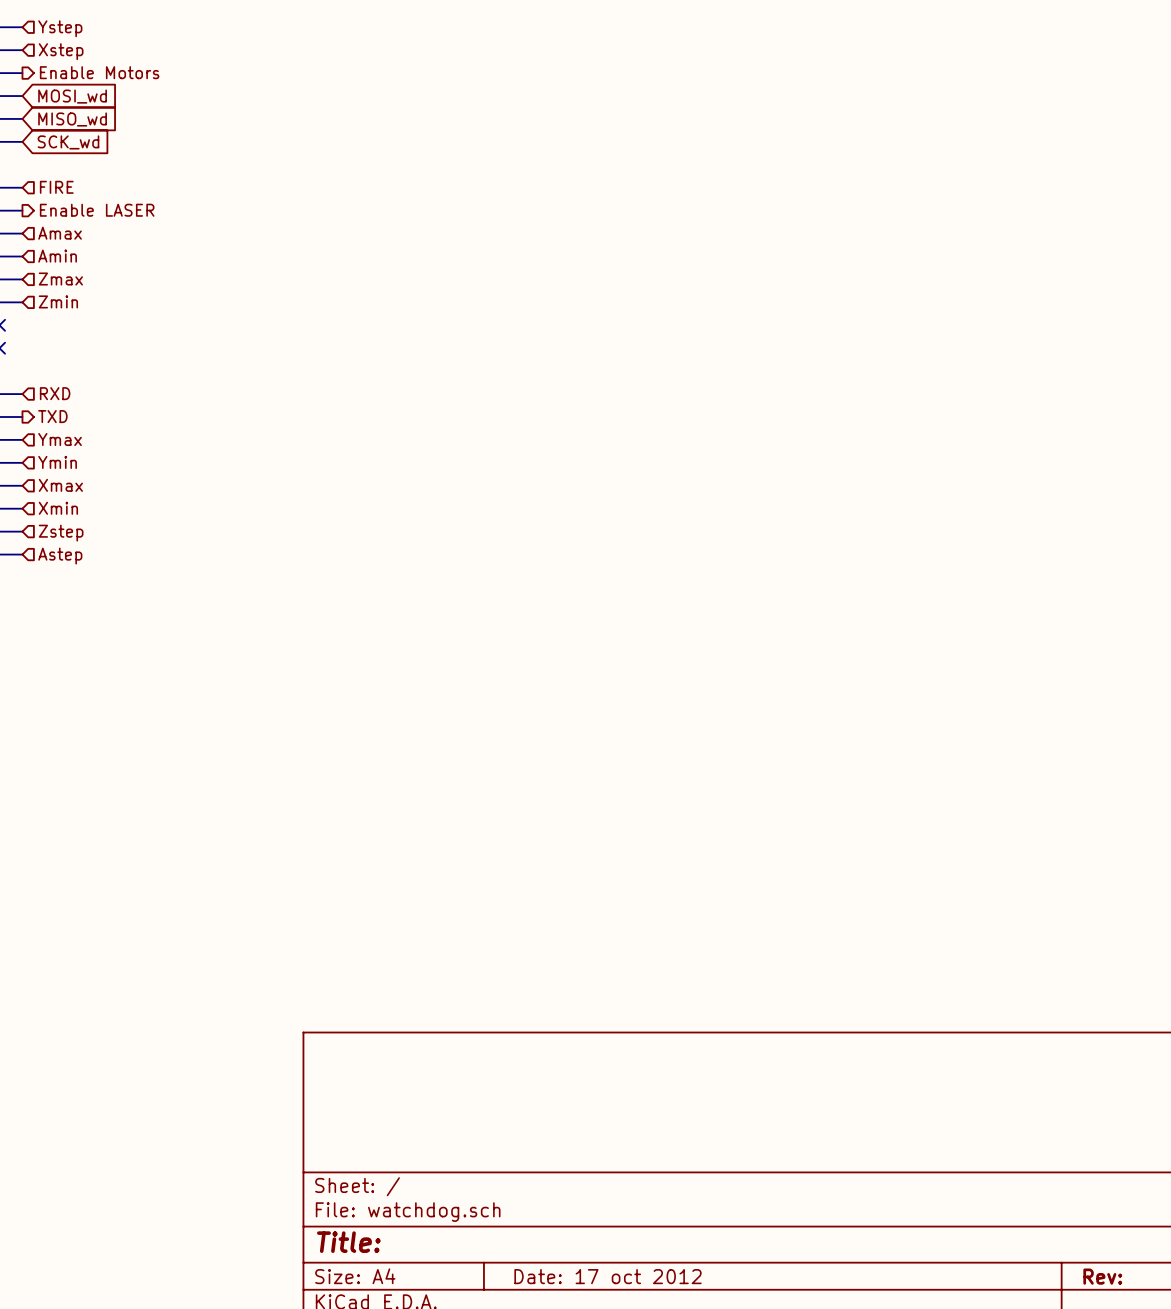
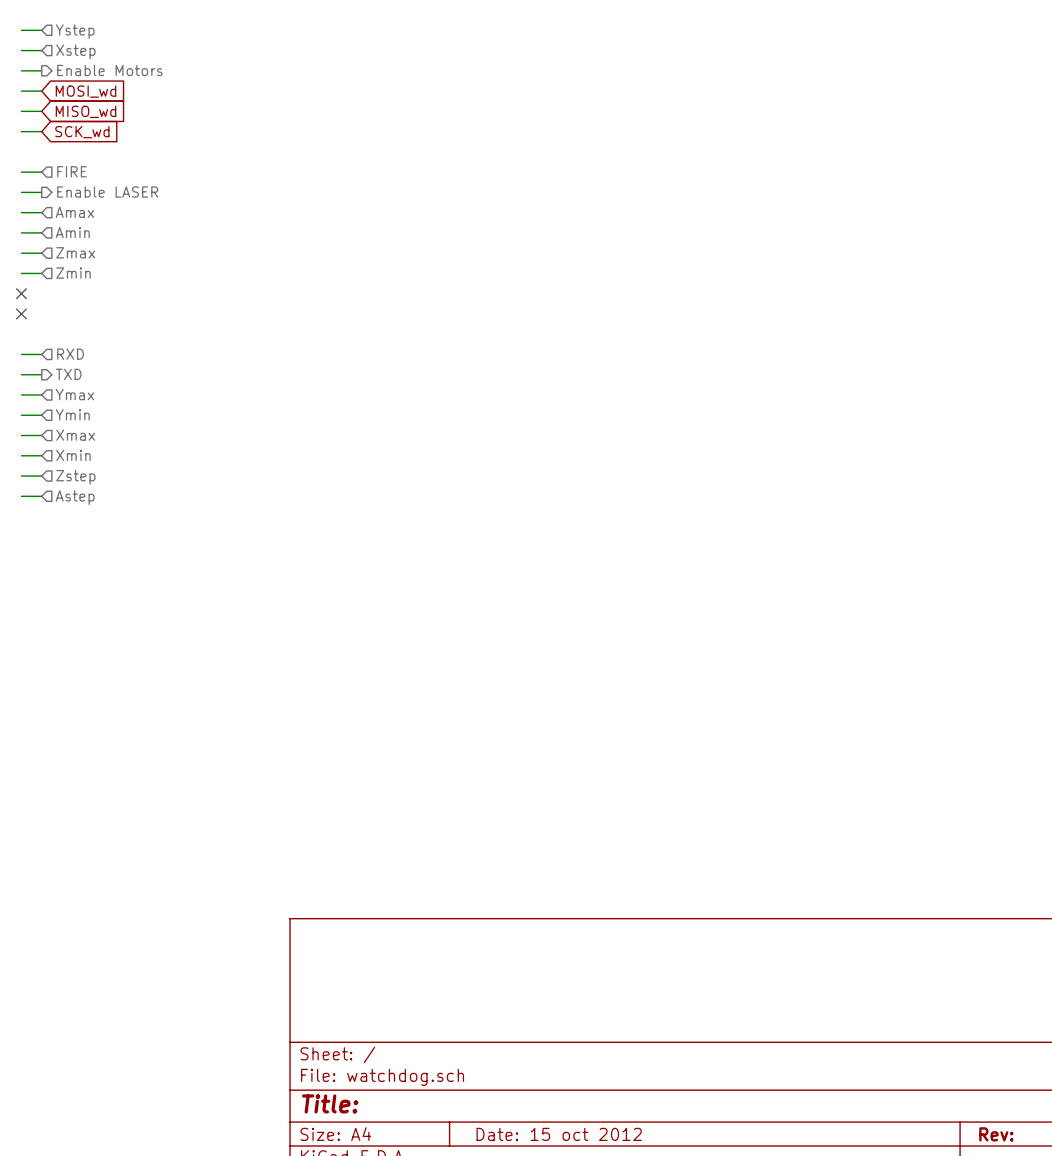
title block: Date: 17 oct 2012 (608, 1276) -> Date: 15 oct 2012 (559, 1134)

